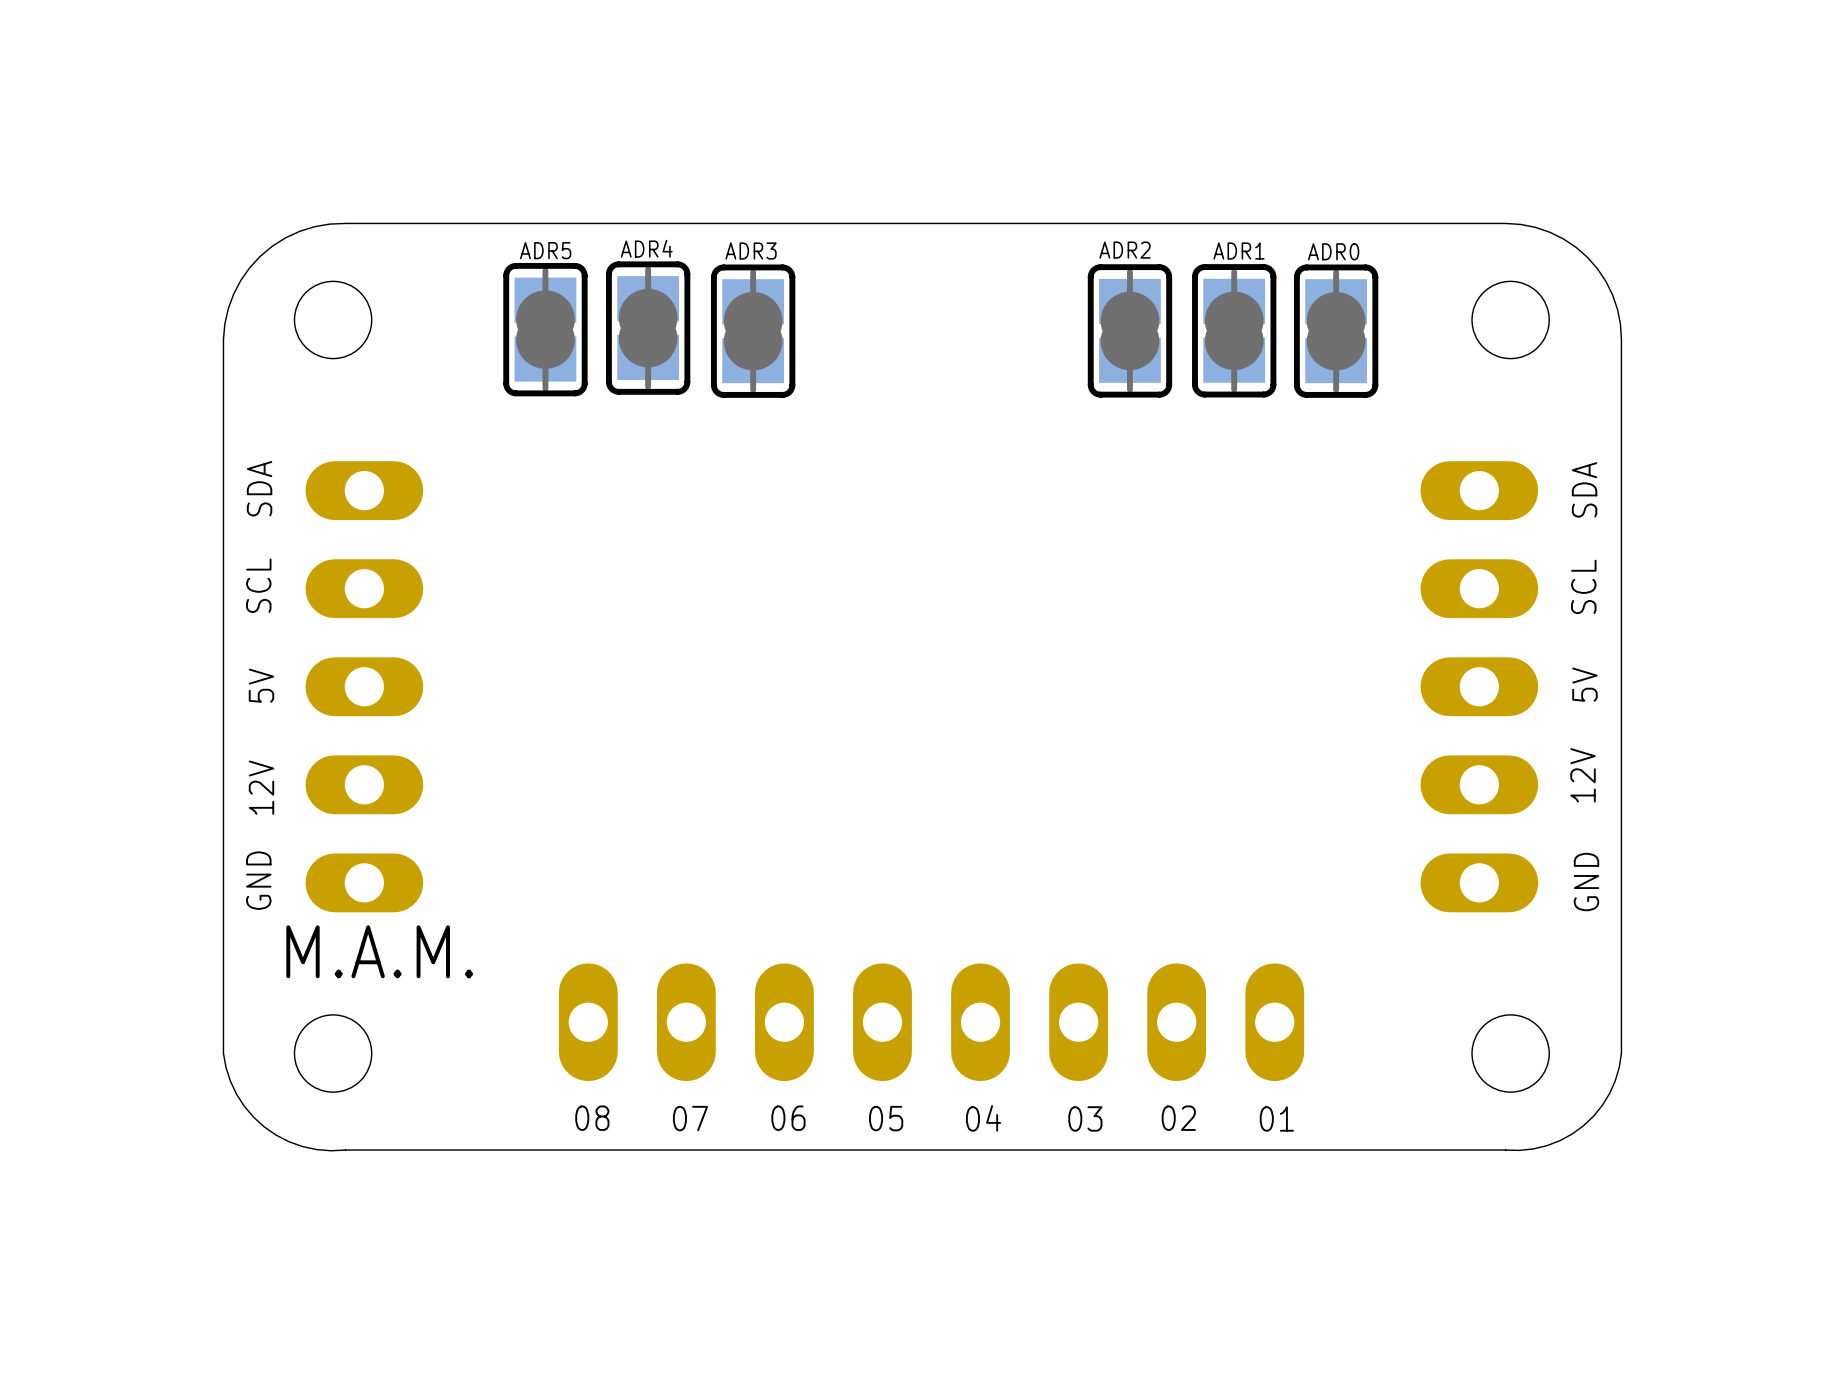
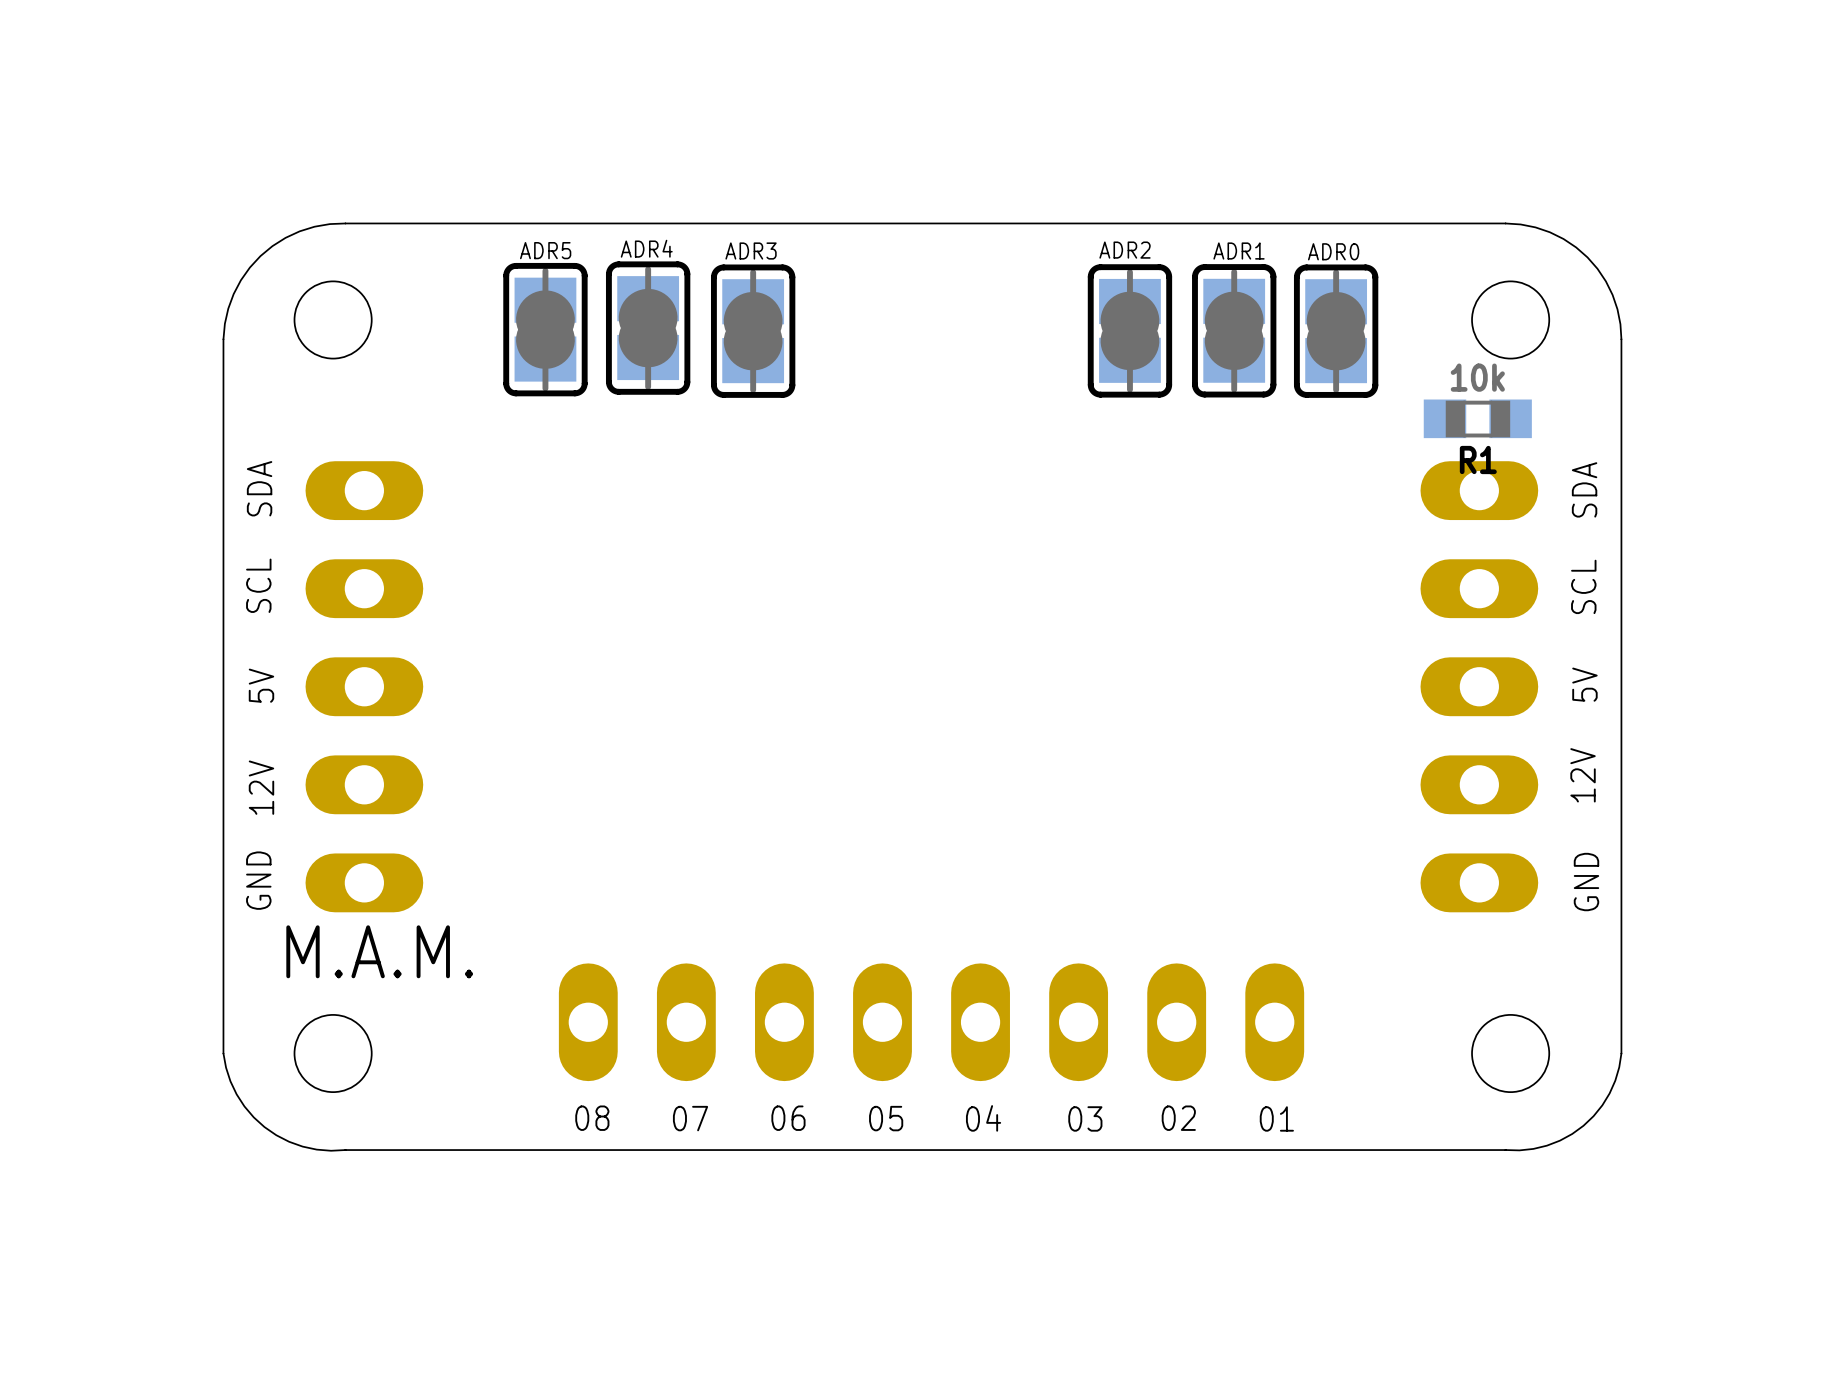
R1: none -> 10k (1477, 418)

